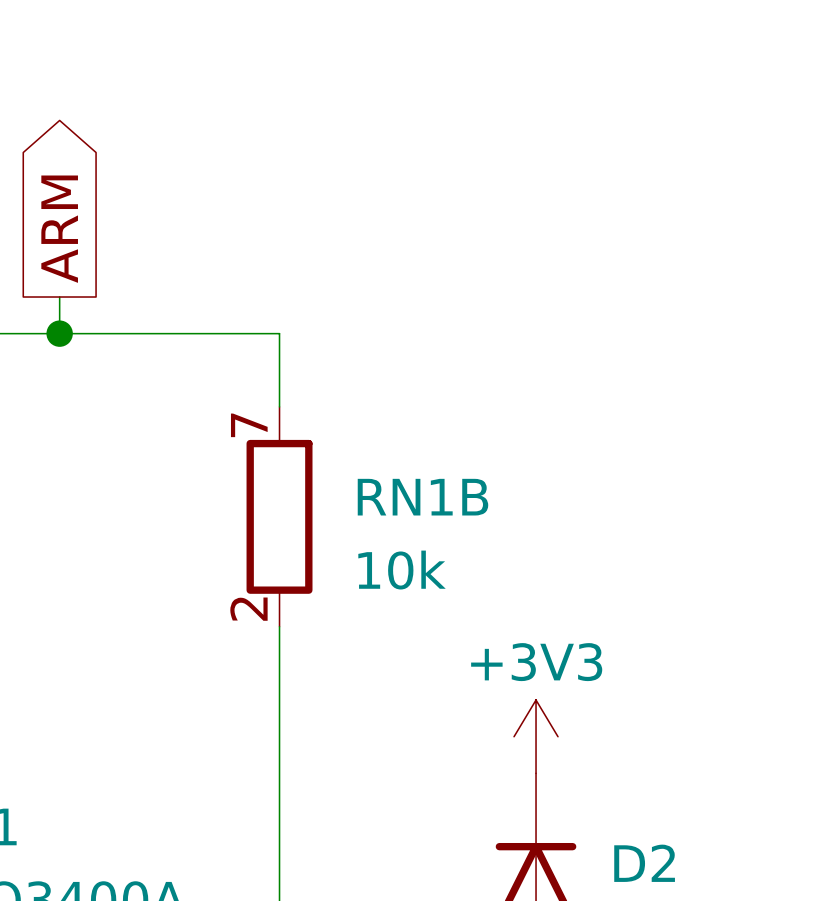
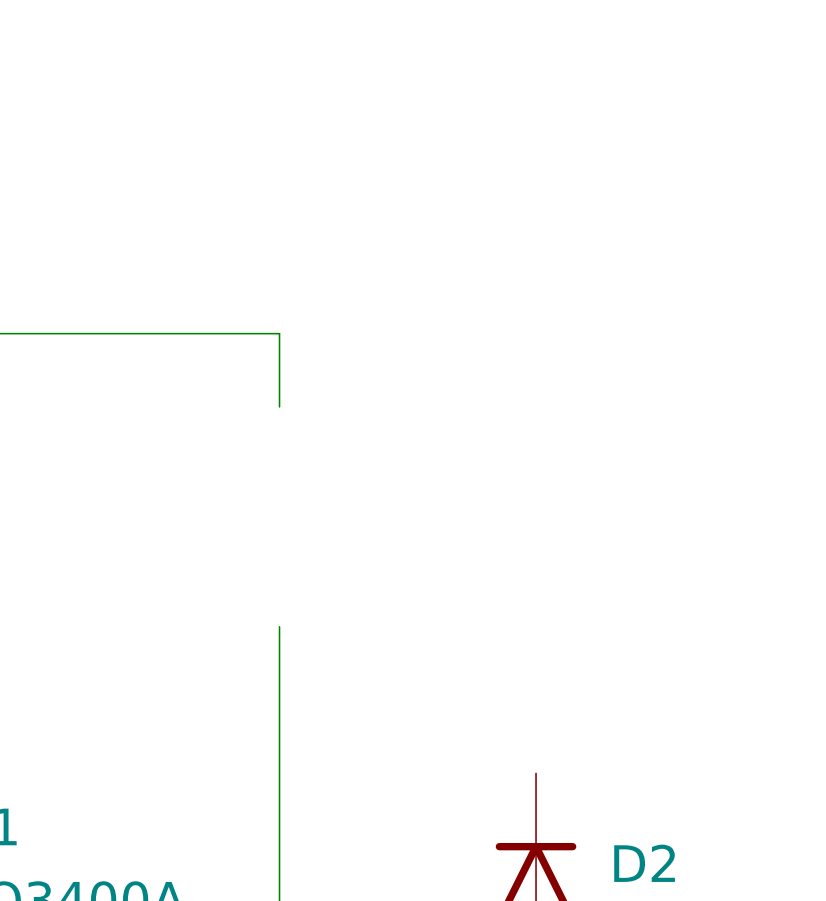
global label: ARM (59, 229) -> none
wire: (59, 297) (59, 333) -> none
junction: (59, 333) -> none
RN1B: 10k (279, 516) -> none
power symbol: +3V3 (536, 736) -> none

